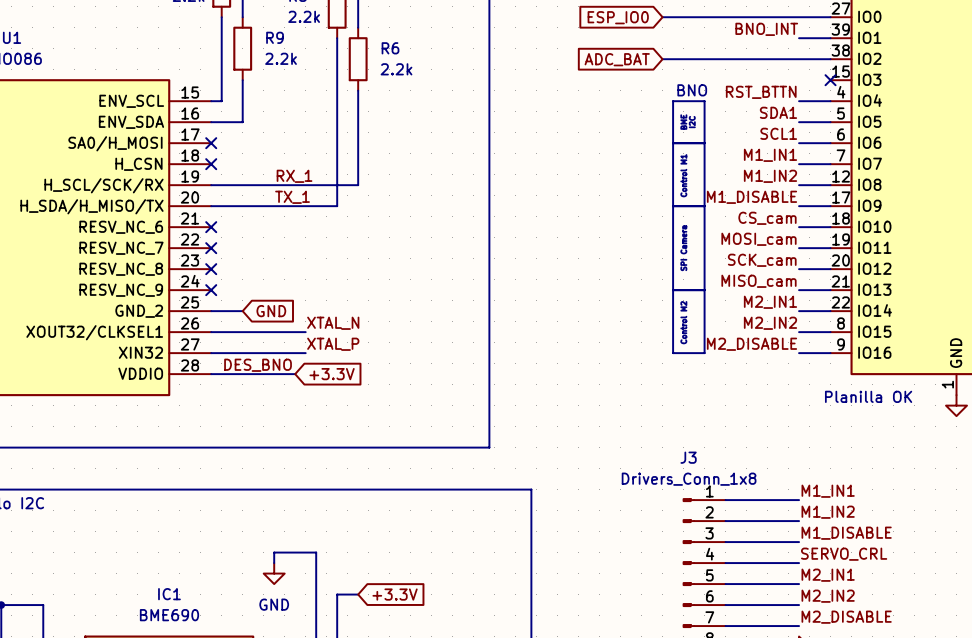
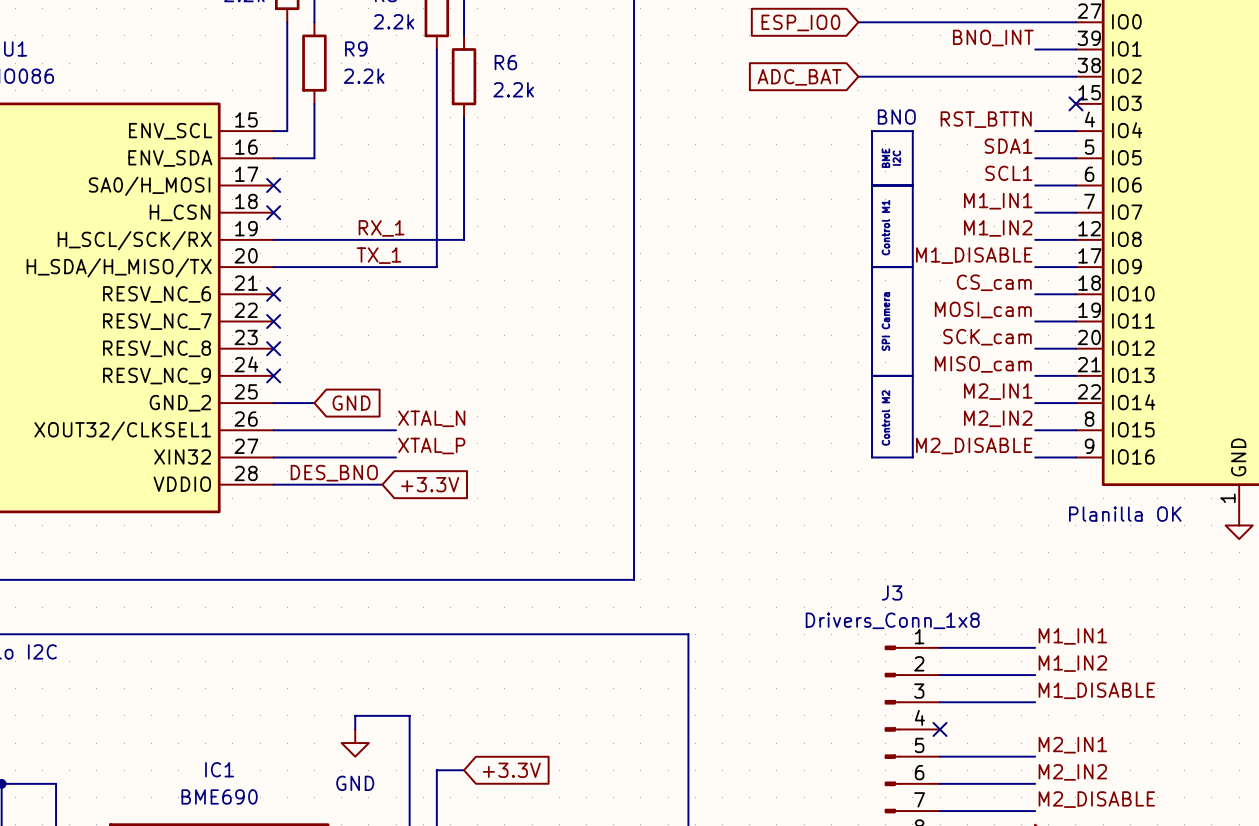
label: SERVO_CRL (844, 554) -> none
wire: (725, 563) (799, 563) -> none
no-connect mark: none -> (940, 729)

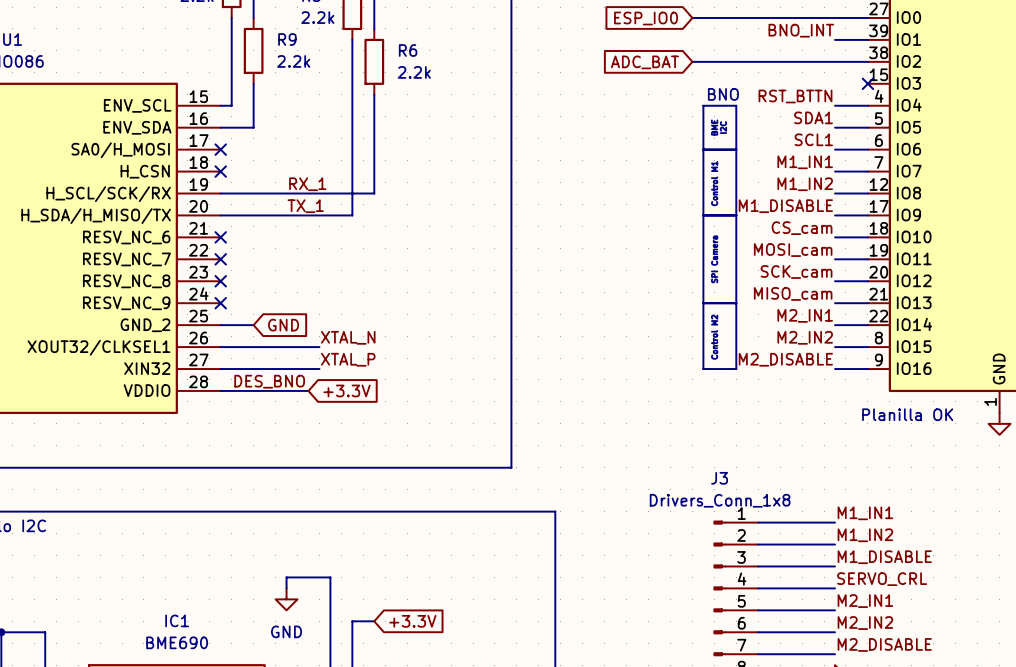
label: none -> SERVO_CRL (882, 579)
wire: none -> (758, 588) (835, 588)
no-connect mark: (940, 729) -> none

